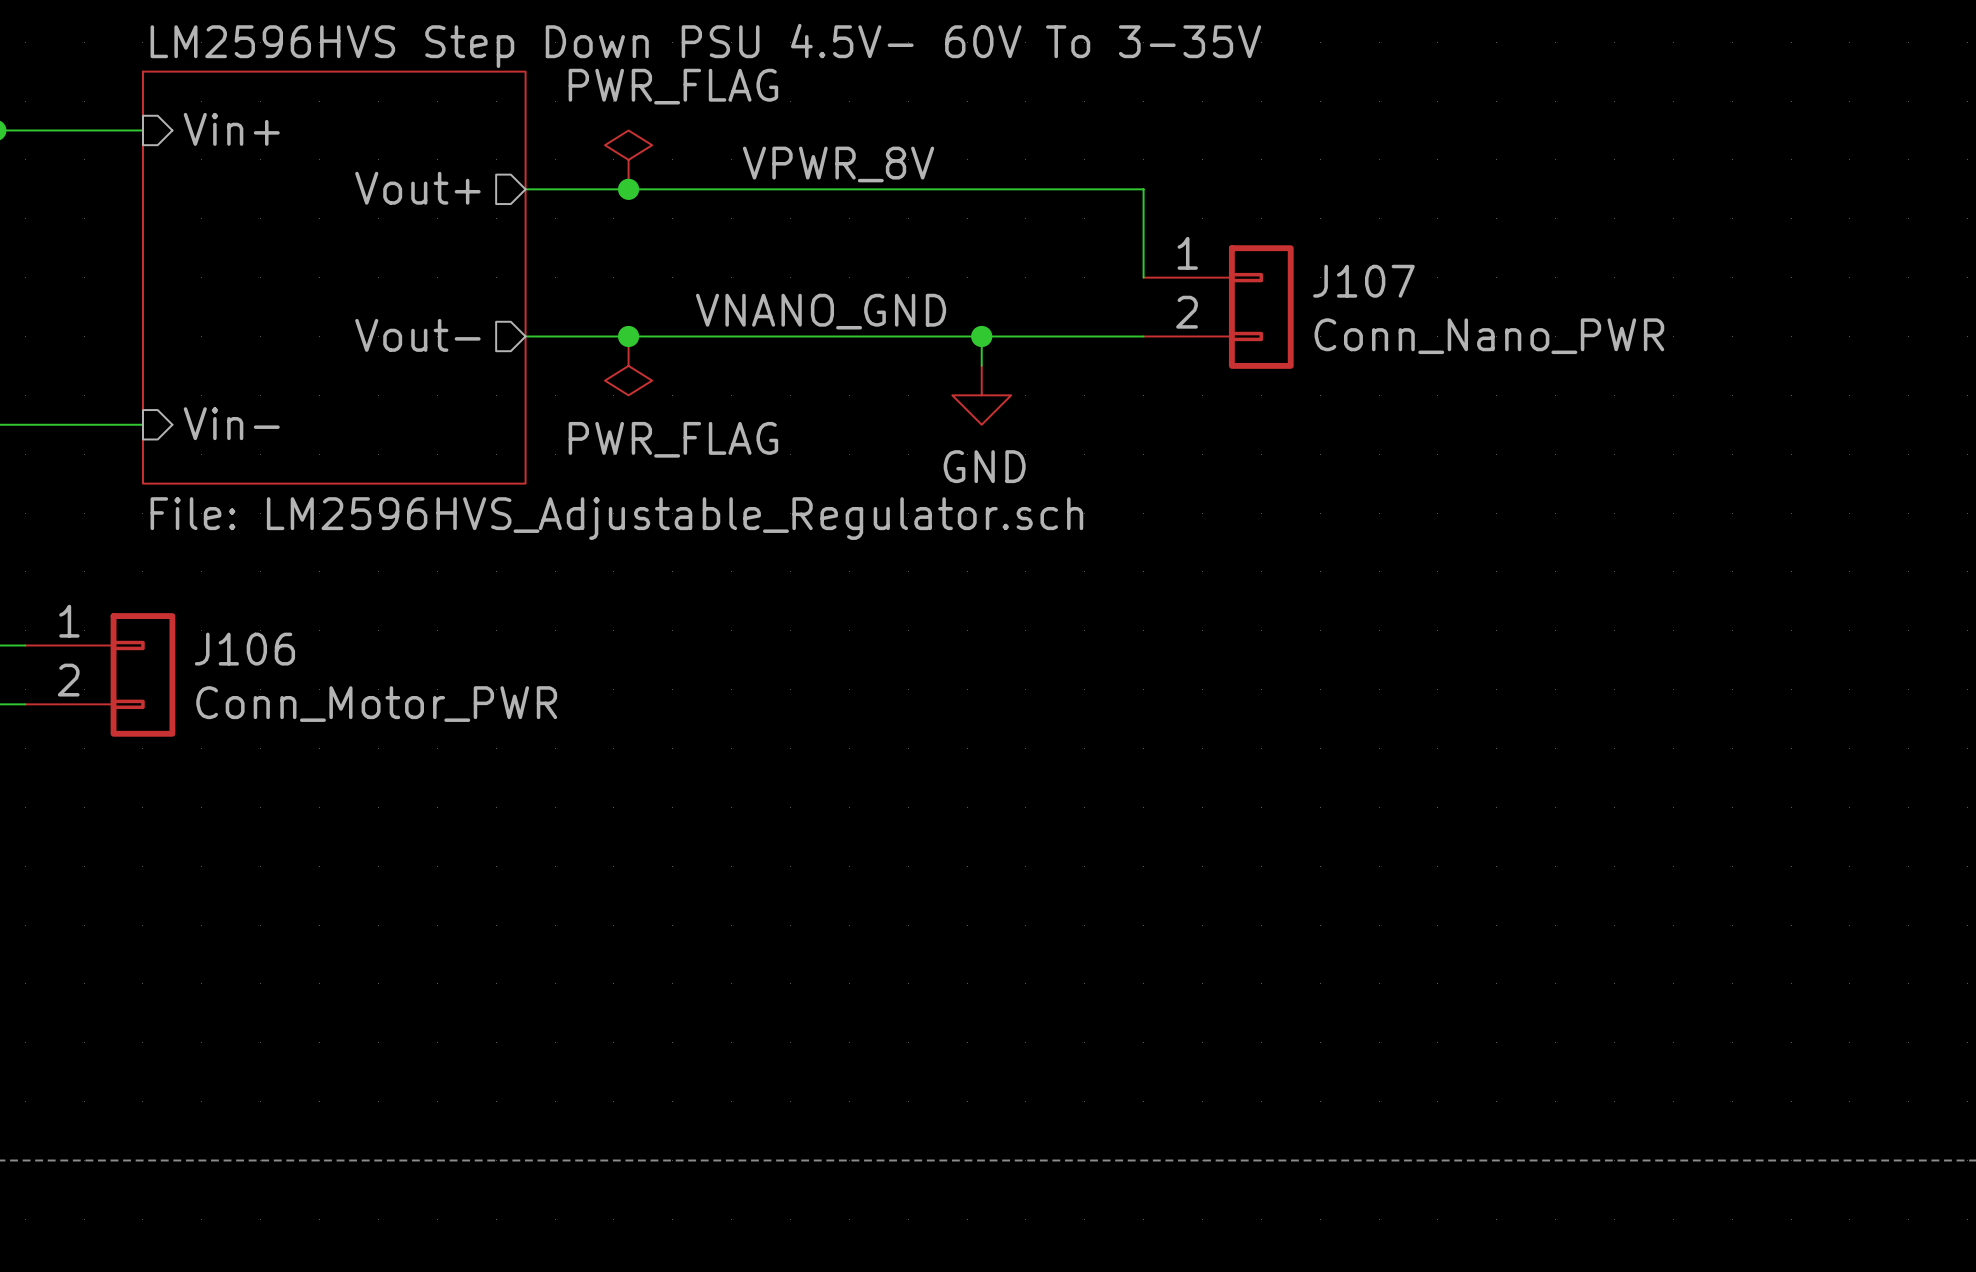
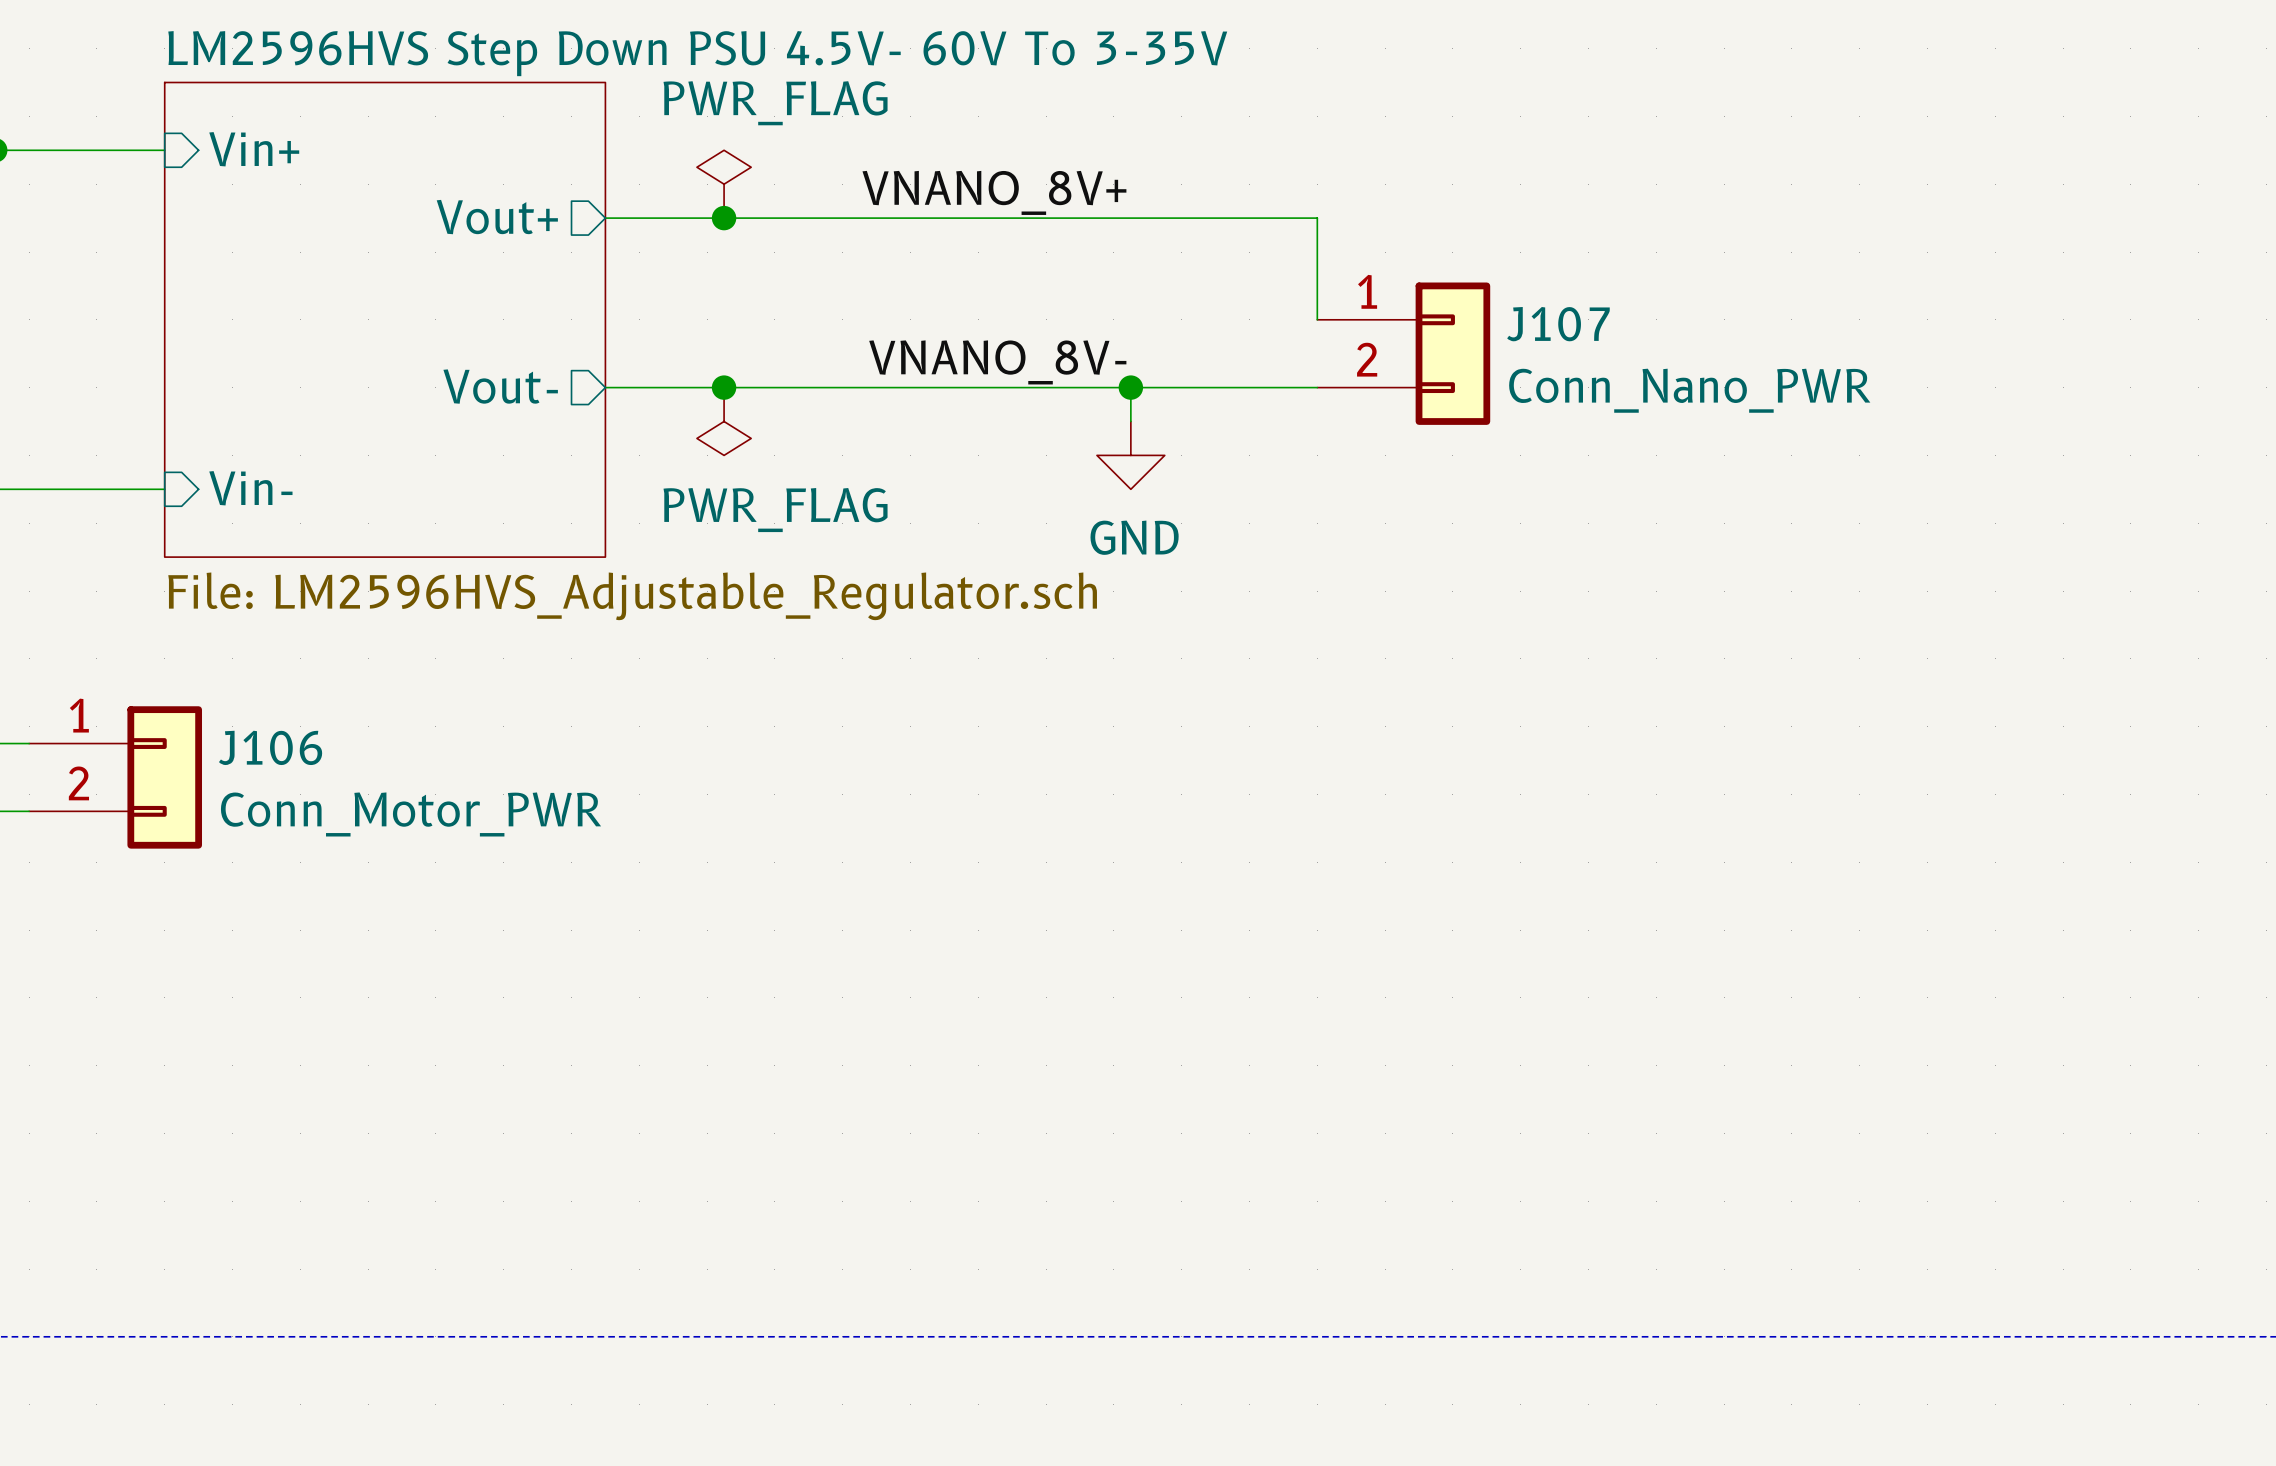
label: VPWR_8V (838, 164) -> none
label: none -> VNANO_8V+ (994, 192)
label: VNANO_GND (821, 311) -> VNANO_8V- (997, 362)

